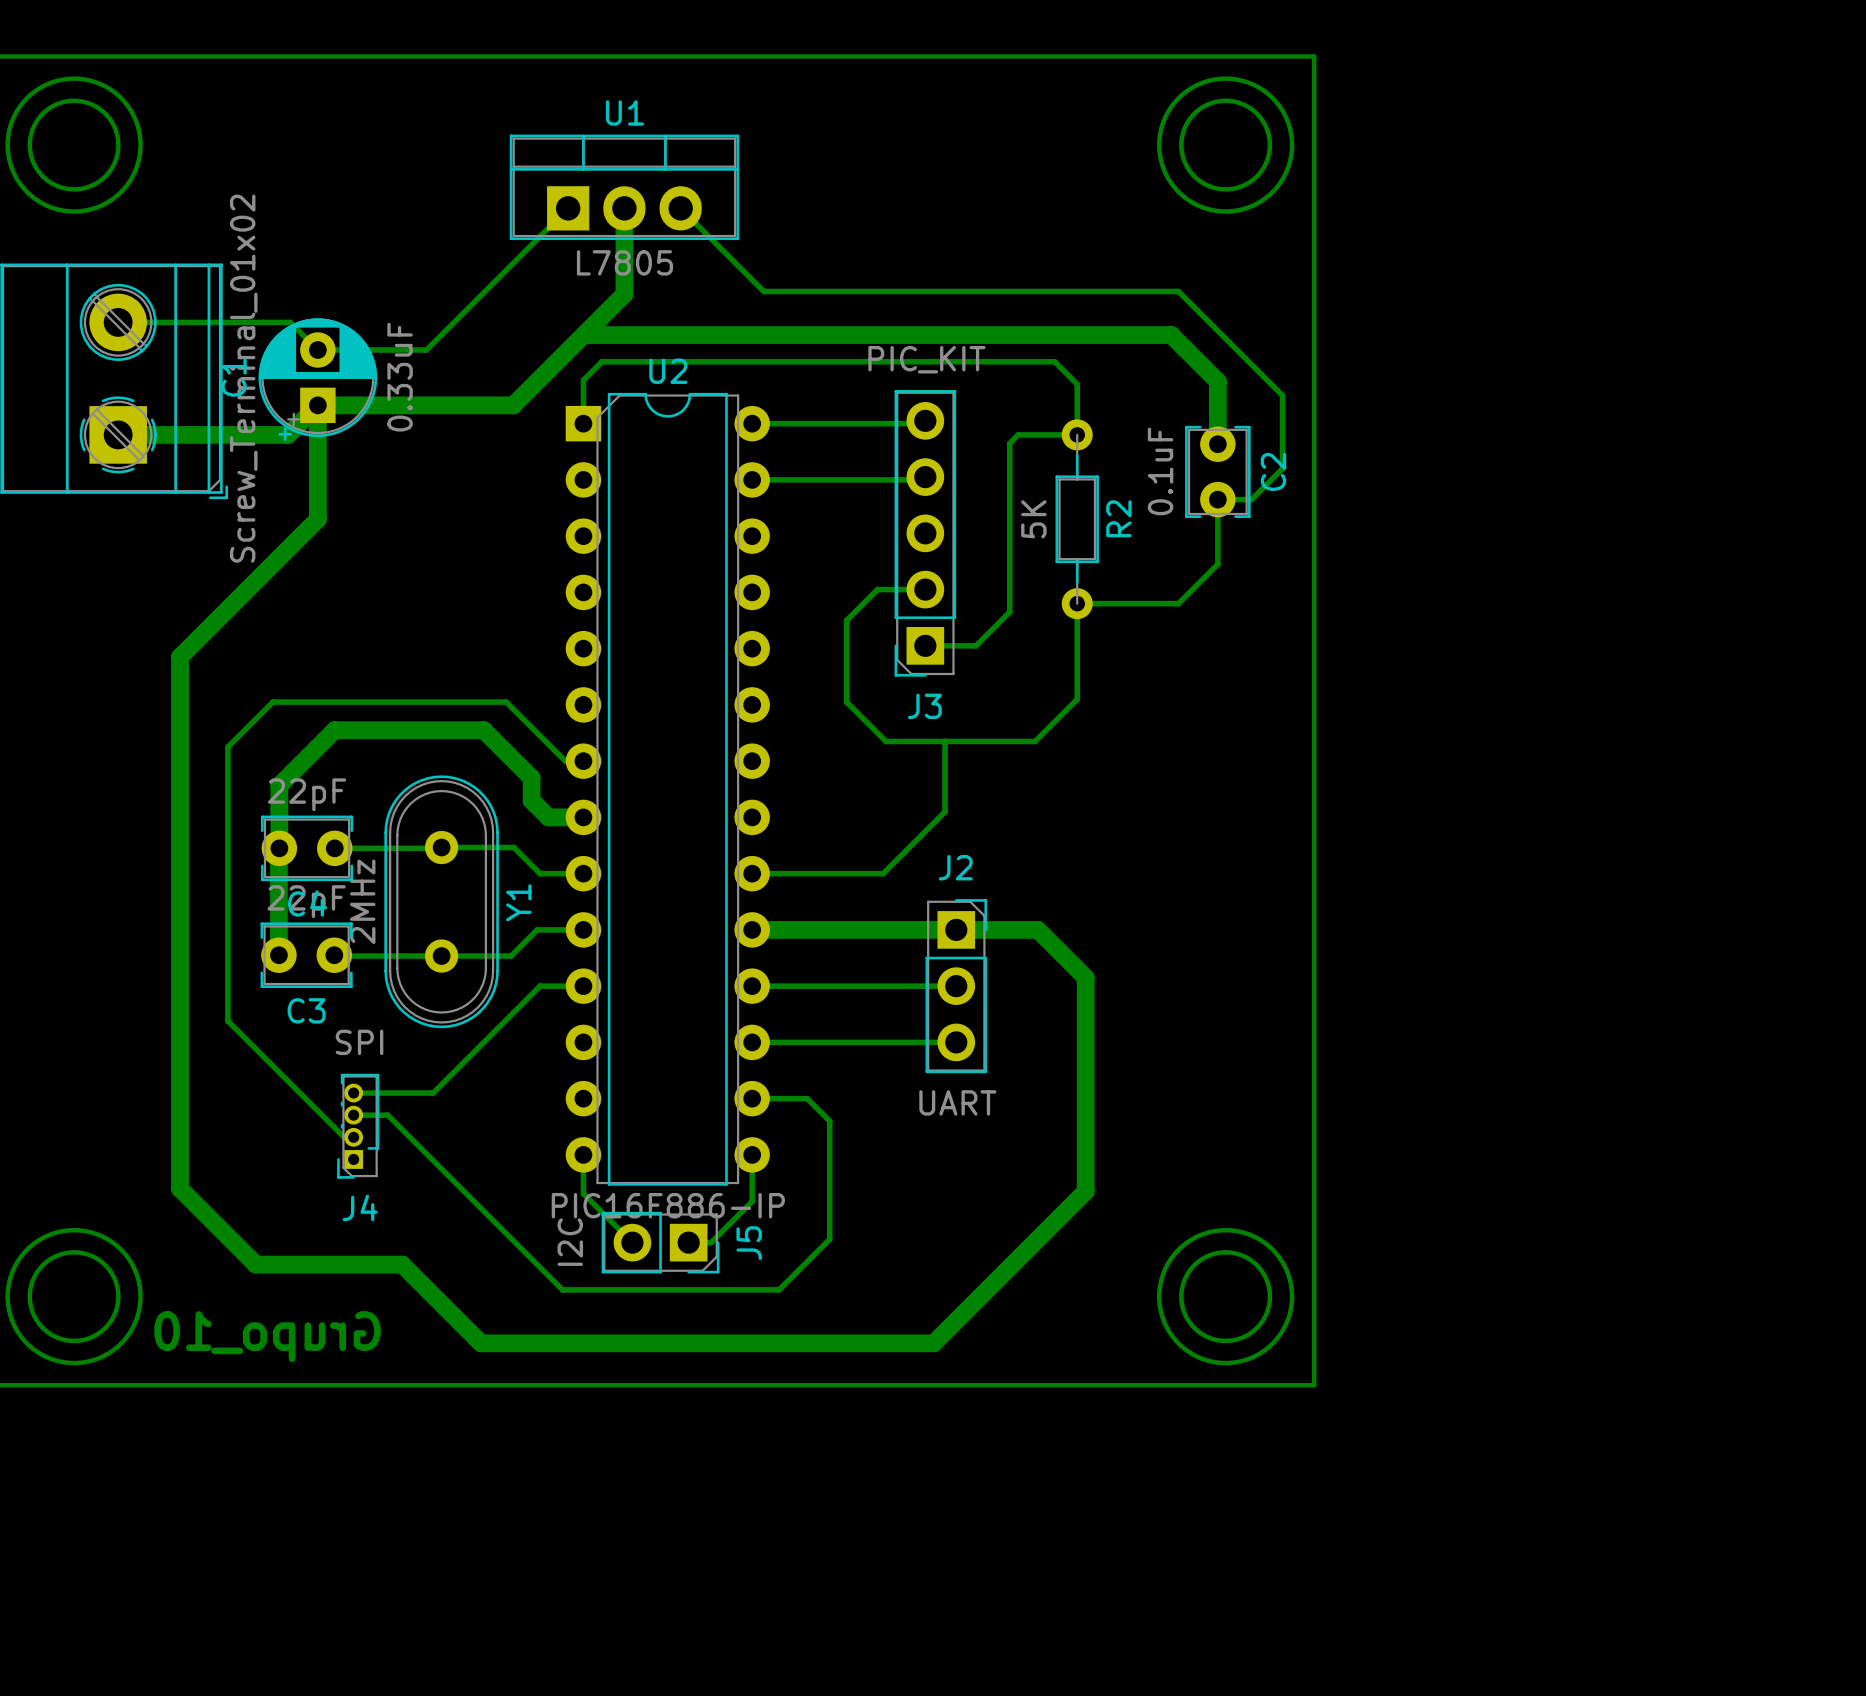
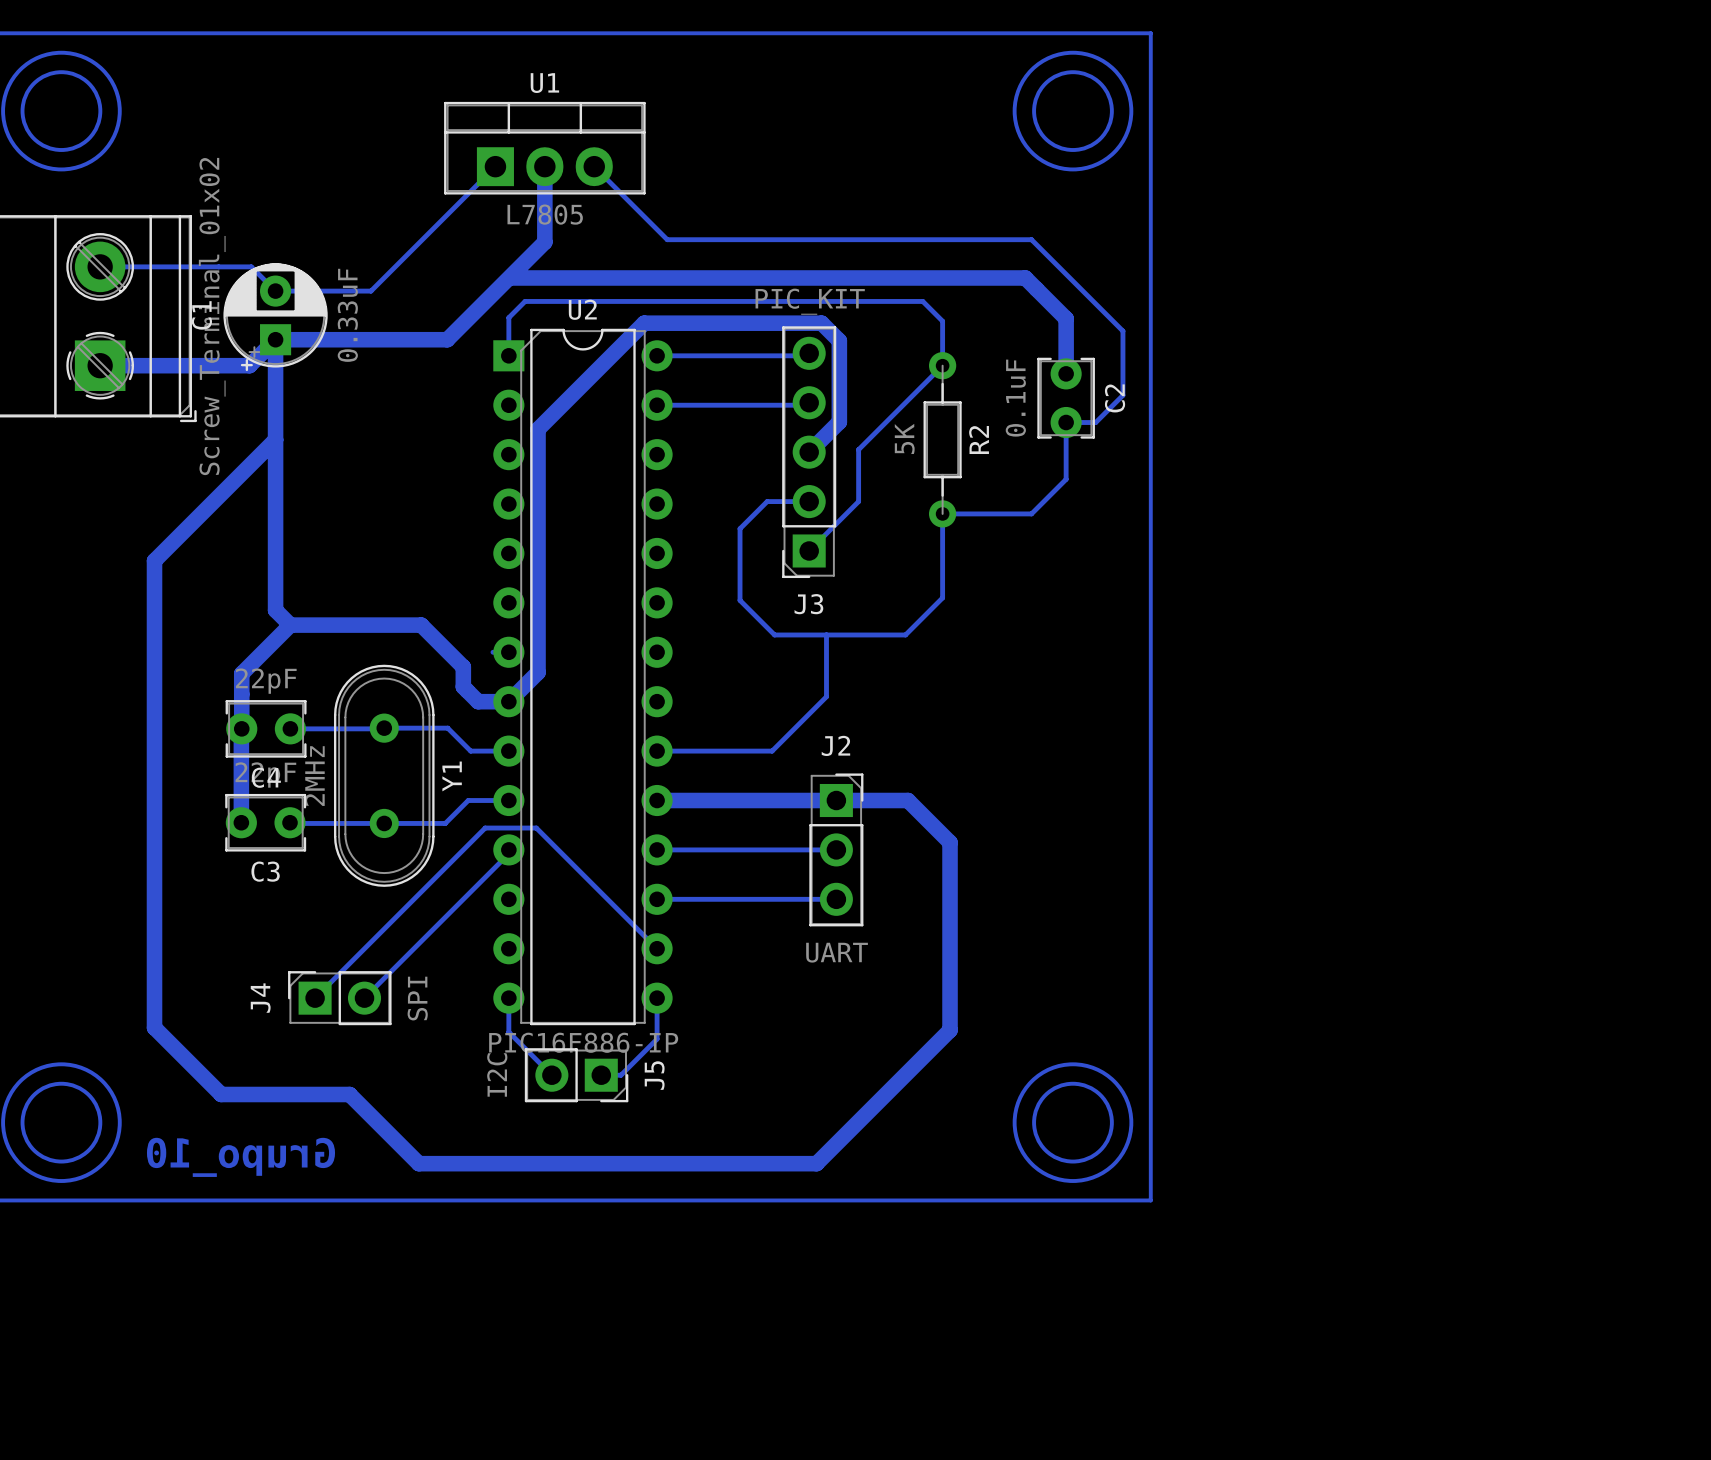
bottom track: (1077, 434) (1018, 434) (1009, 443) (1009, 612) (975, 645) (925, 645) -> (942, 365) (858, 449) (858, 501) (809, 550)
bottom track: none -> (275, 439) (275, 610) (290, 625)
bottom track: none -> (809, 452) (839, 422) (839, 340) (821, 323) (644, 323) (538, 429) (538, 672) (508, 701)
bottom track: (565, 761) (506, 702) (272, 702) (227, 747) (227, 1020) (344, 1137) (353, 1137) -> none
bottom track: (583, 986) (540, 986) (433, 1093) (353, 1093) -> (508, 849) (508, 853) (364, 998)
J4 value position: SPI (359, 1042) -> SPI (417, 998)
J4 footprint: [337, 1073, 380, 1179] -> [288, 971, 392, 1026]
bottom track: (752, 1098) (807, 1098) (829, 1121) (829, 1239) (779, 1289) (562, 1289) (387, 1115) (353, 1115) -> (657, 948) (536, 828) (485, 828) (315, 998)
J4 name position: J4 (360, 1207) -> J4 (260, 998)

